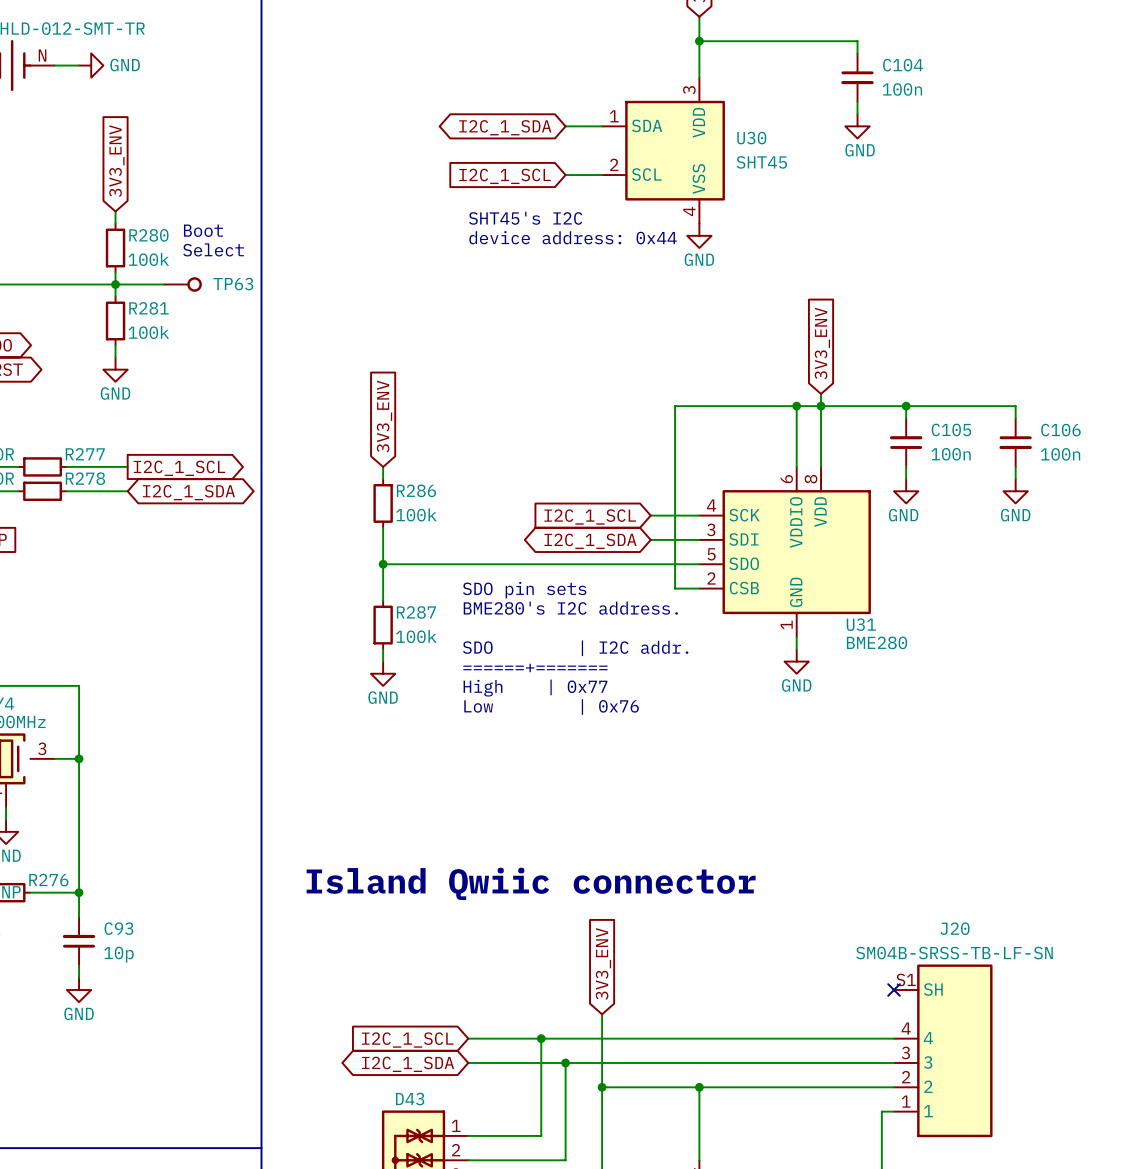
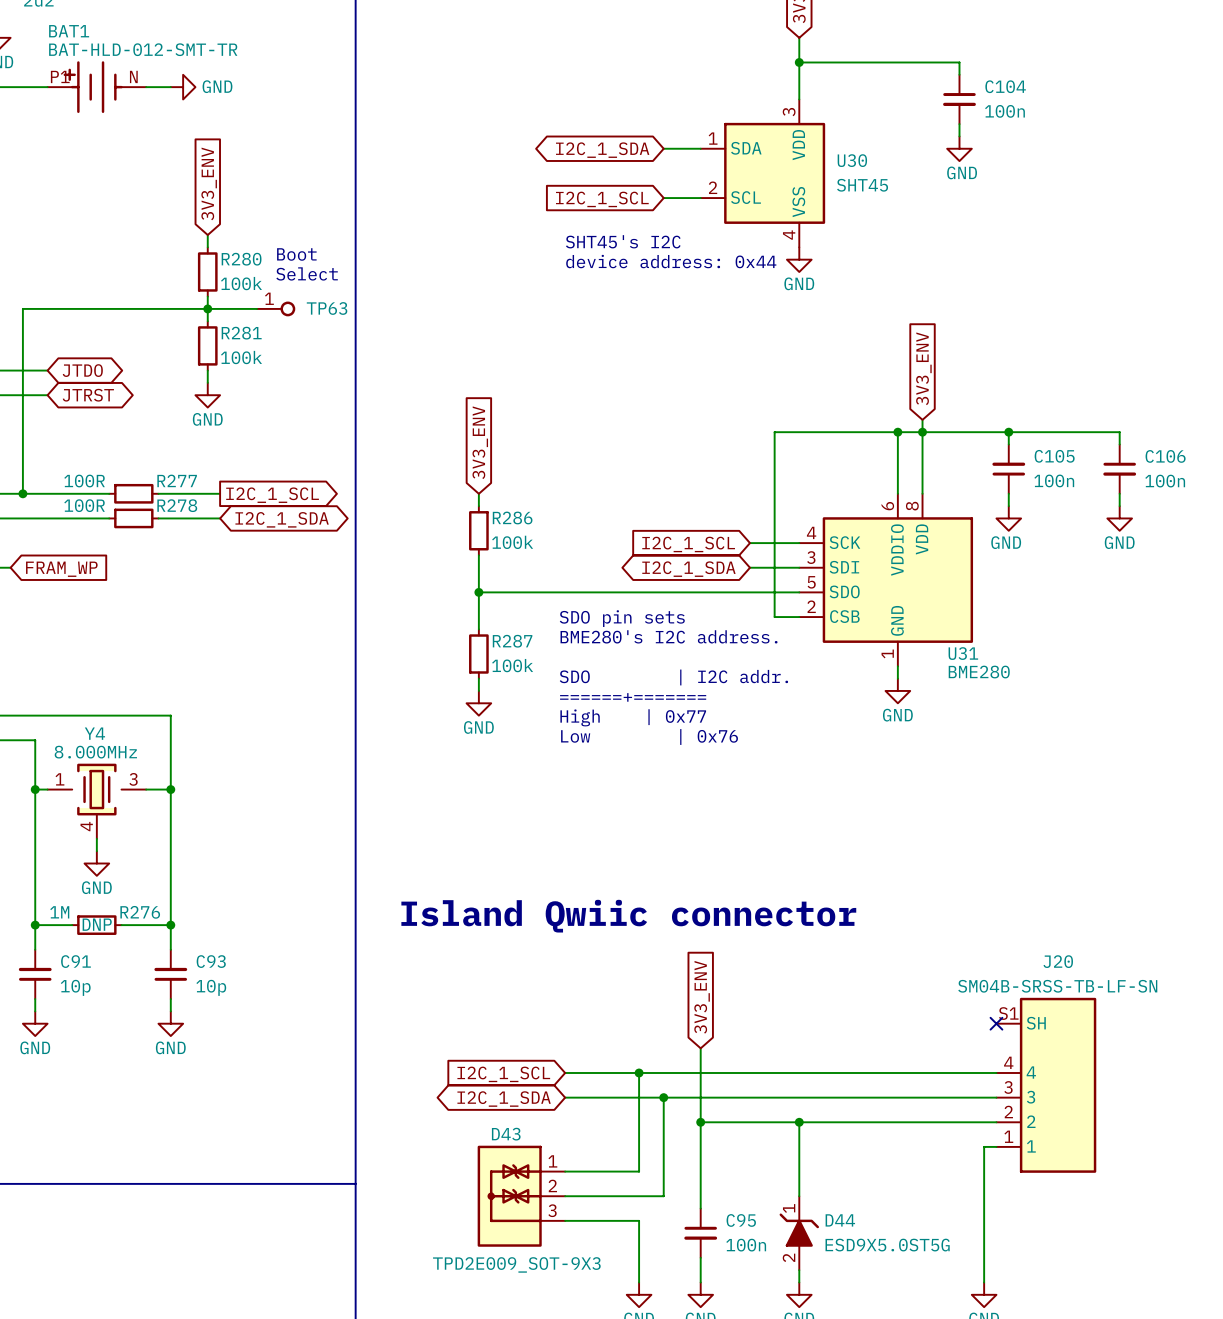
TP63 pin number: none -> 1 (269, 298)

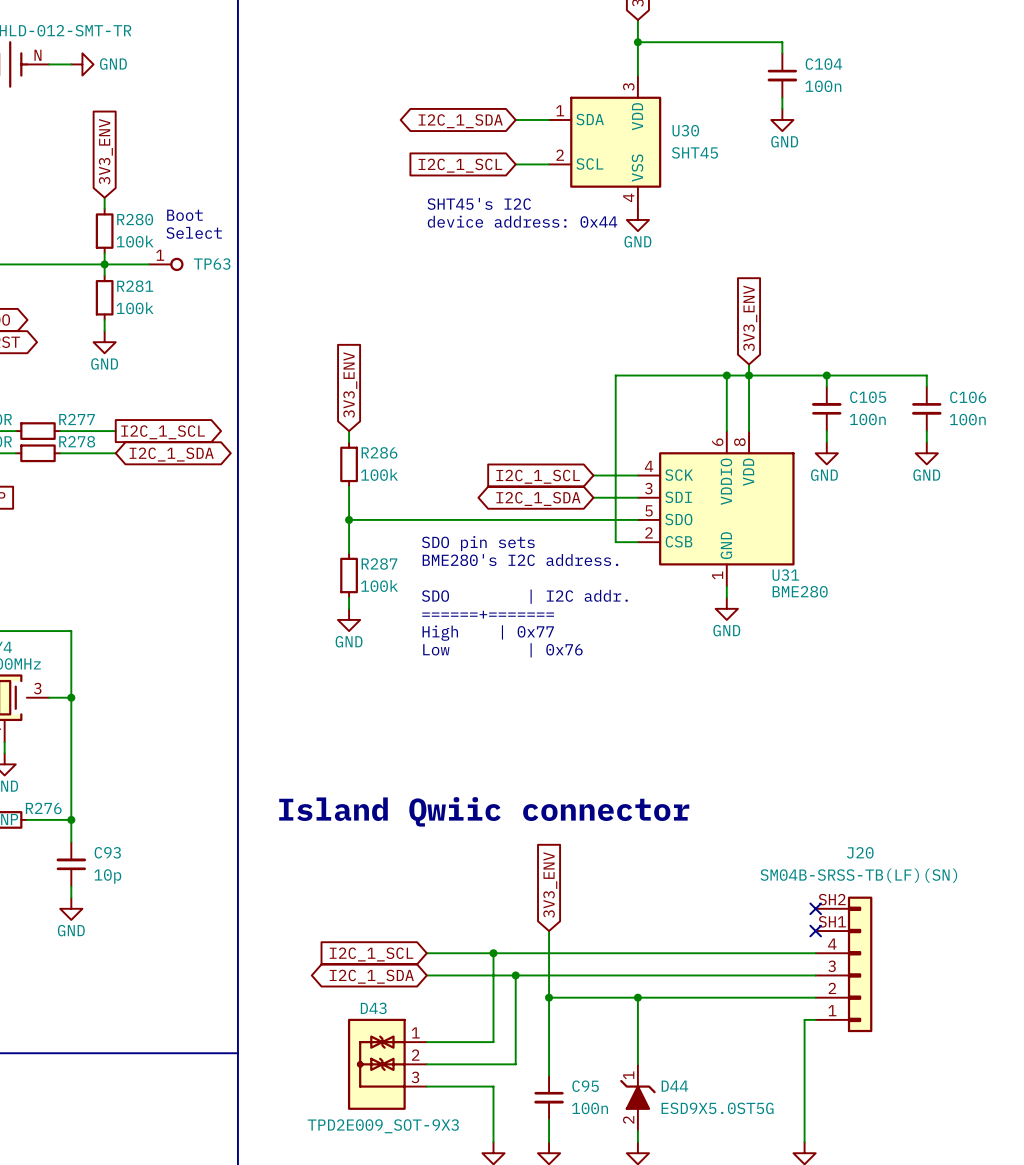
J20 text: none -> SM04B-SRSS-TB(LF)(SN) (858, 875)
J20 value: SM04B-SRSS-TB-LF-SN (1057, 986) -> none
J20 symbol: [996, 997, 1097, 1173] -> [815, 896, 873, 1033]
no-connect mark: none -> (815, 931)

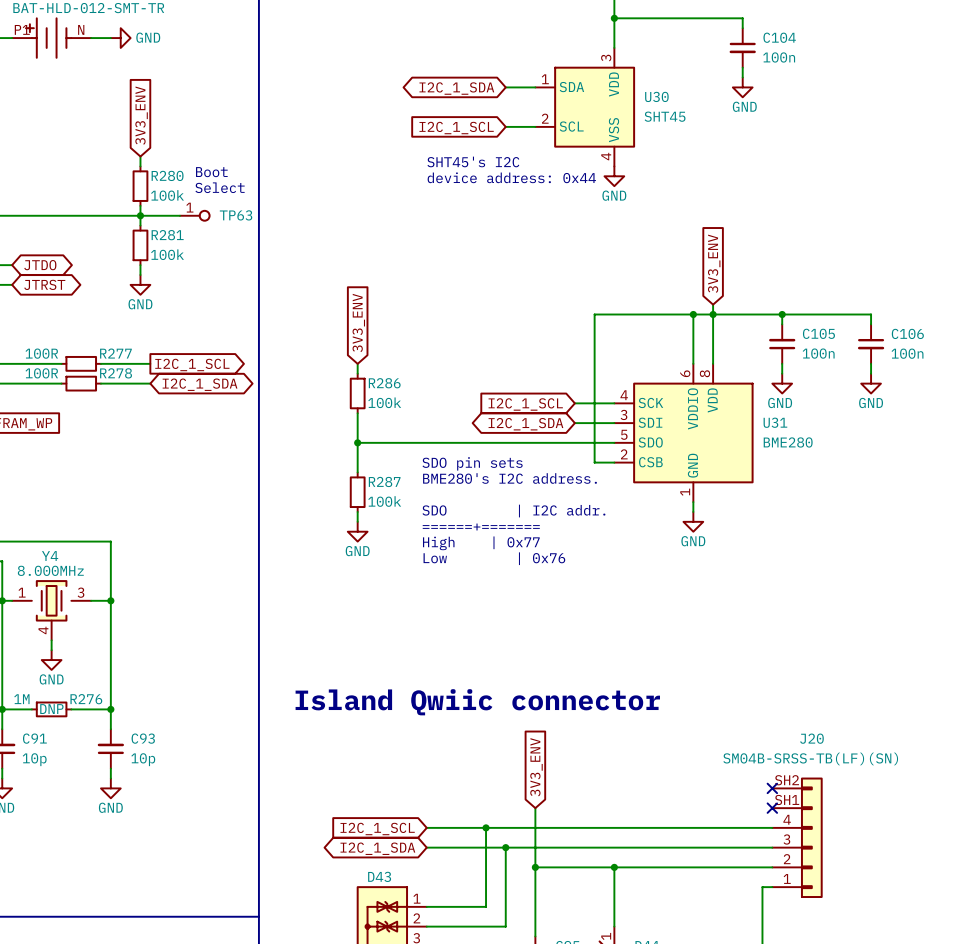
U31 name position: U31 (785, 575) -> U31 (775, 422)
U31 value position: BME280 (800, 591) -> BME280 (788, 442)

